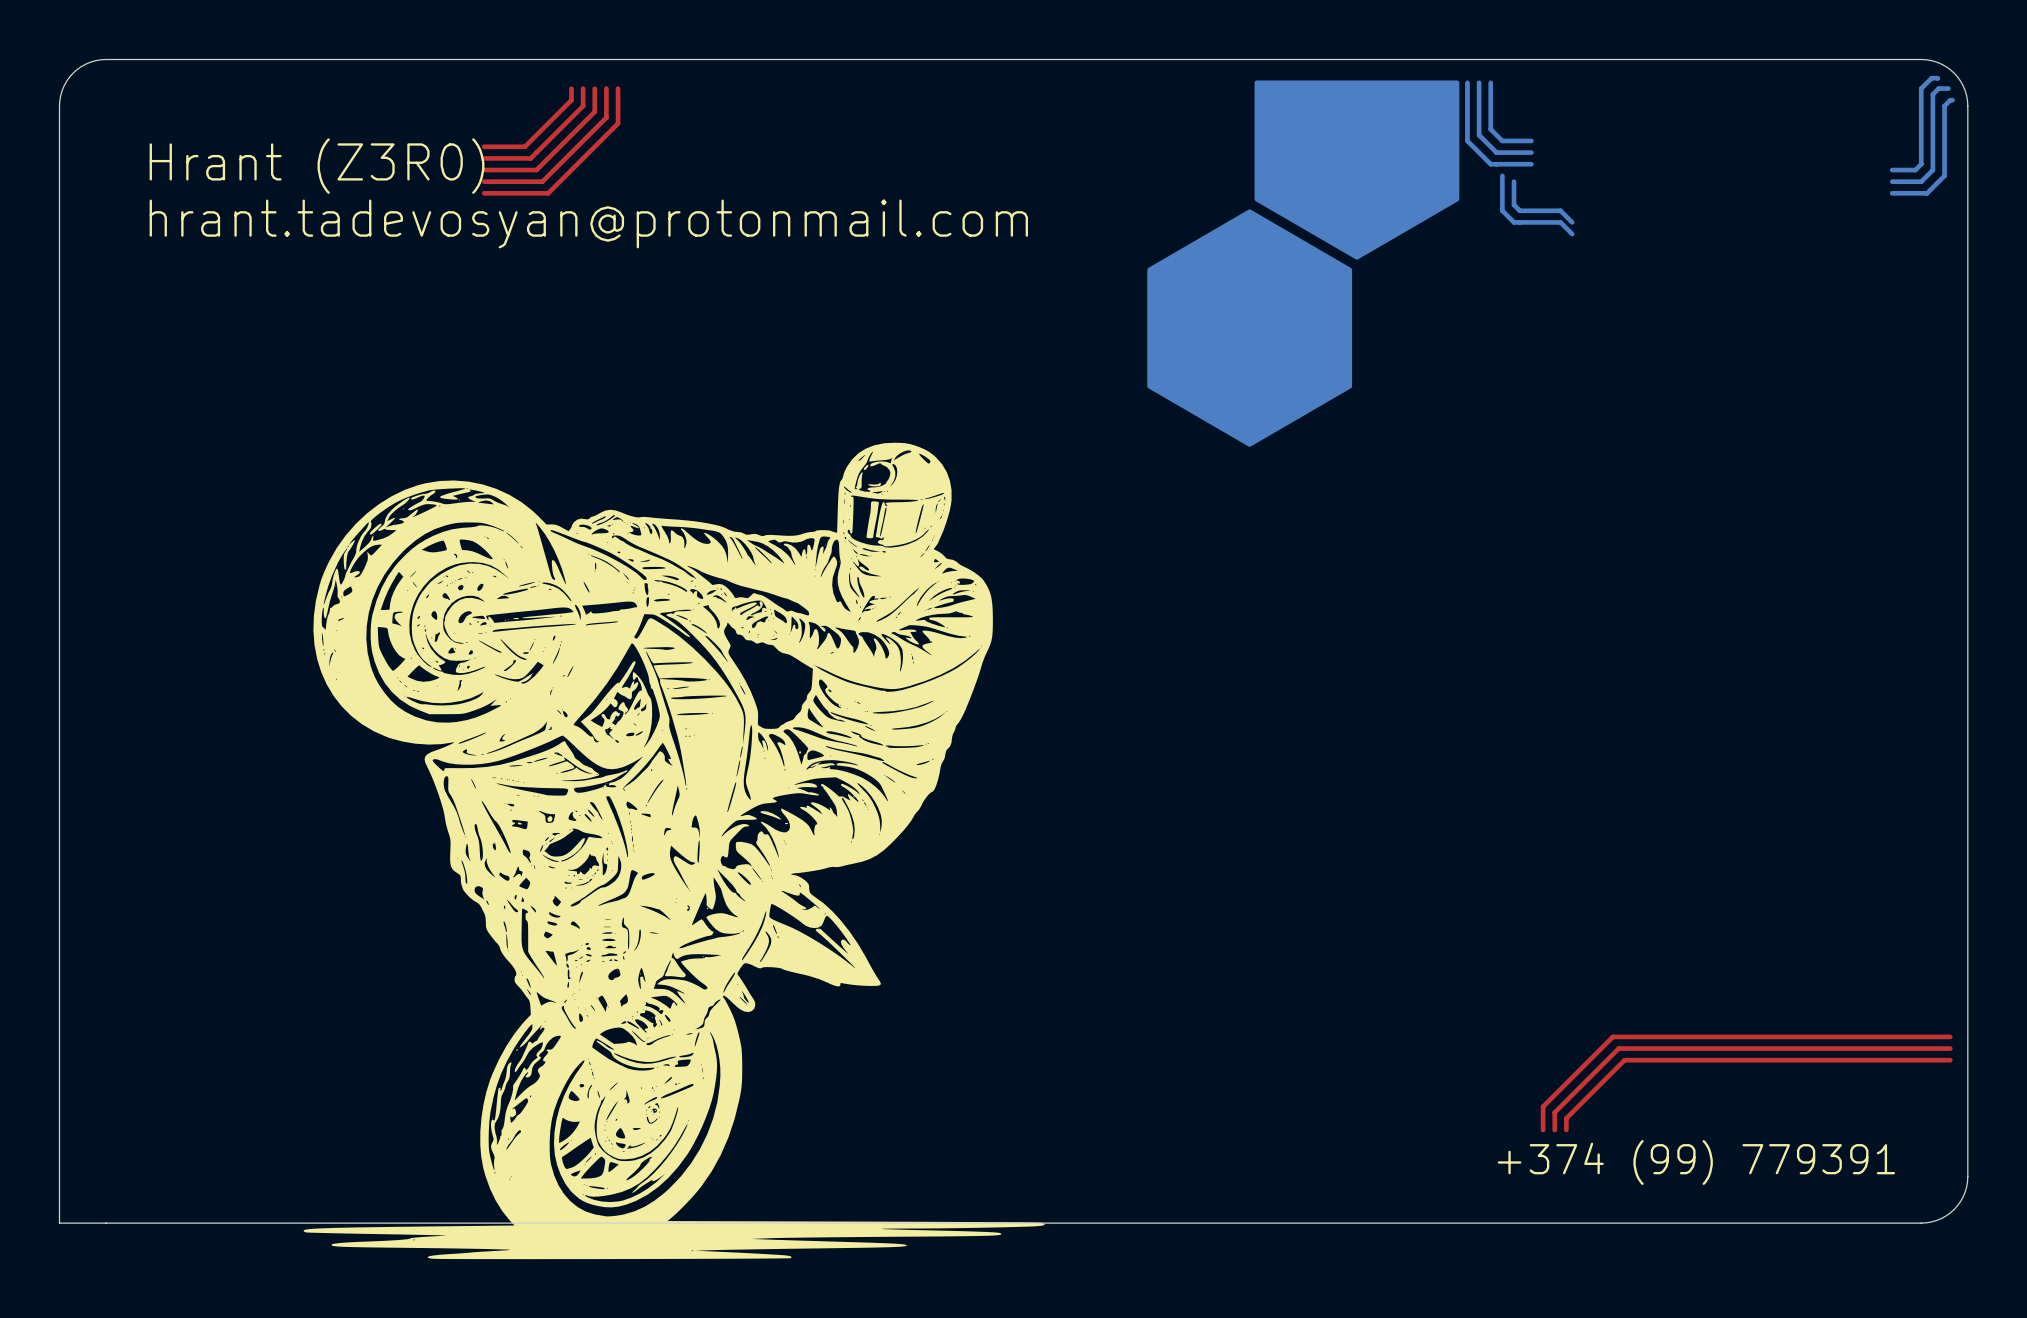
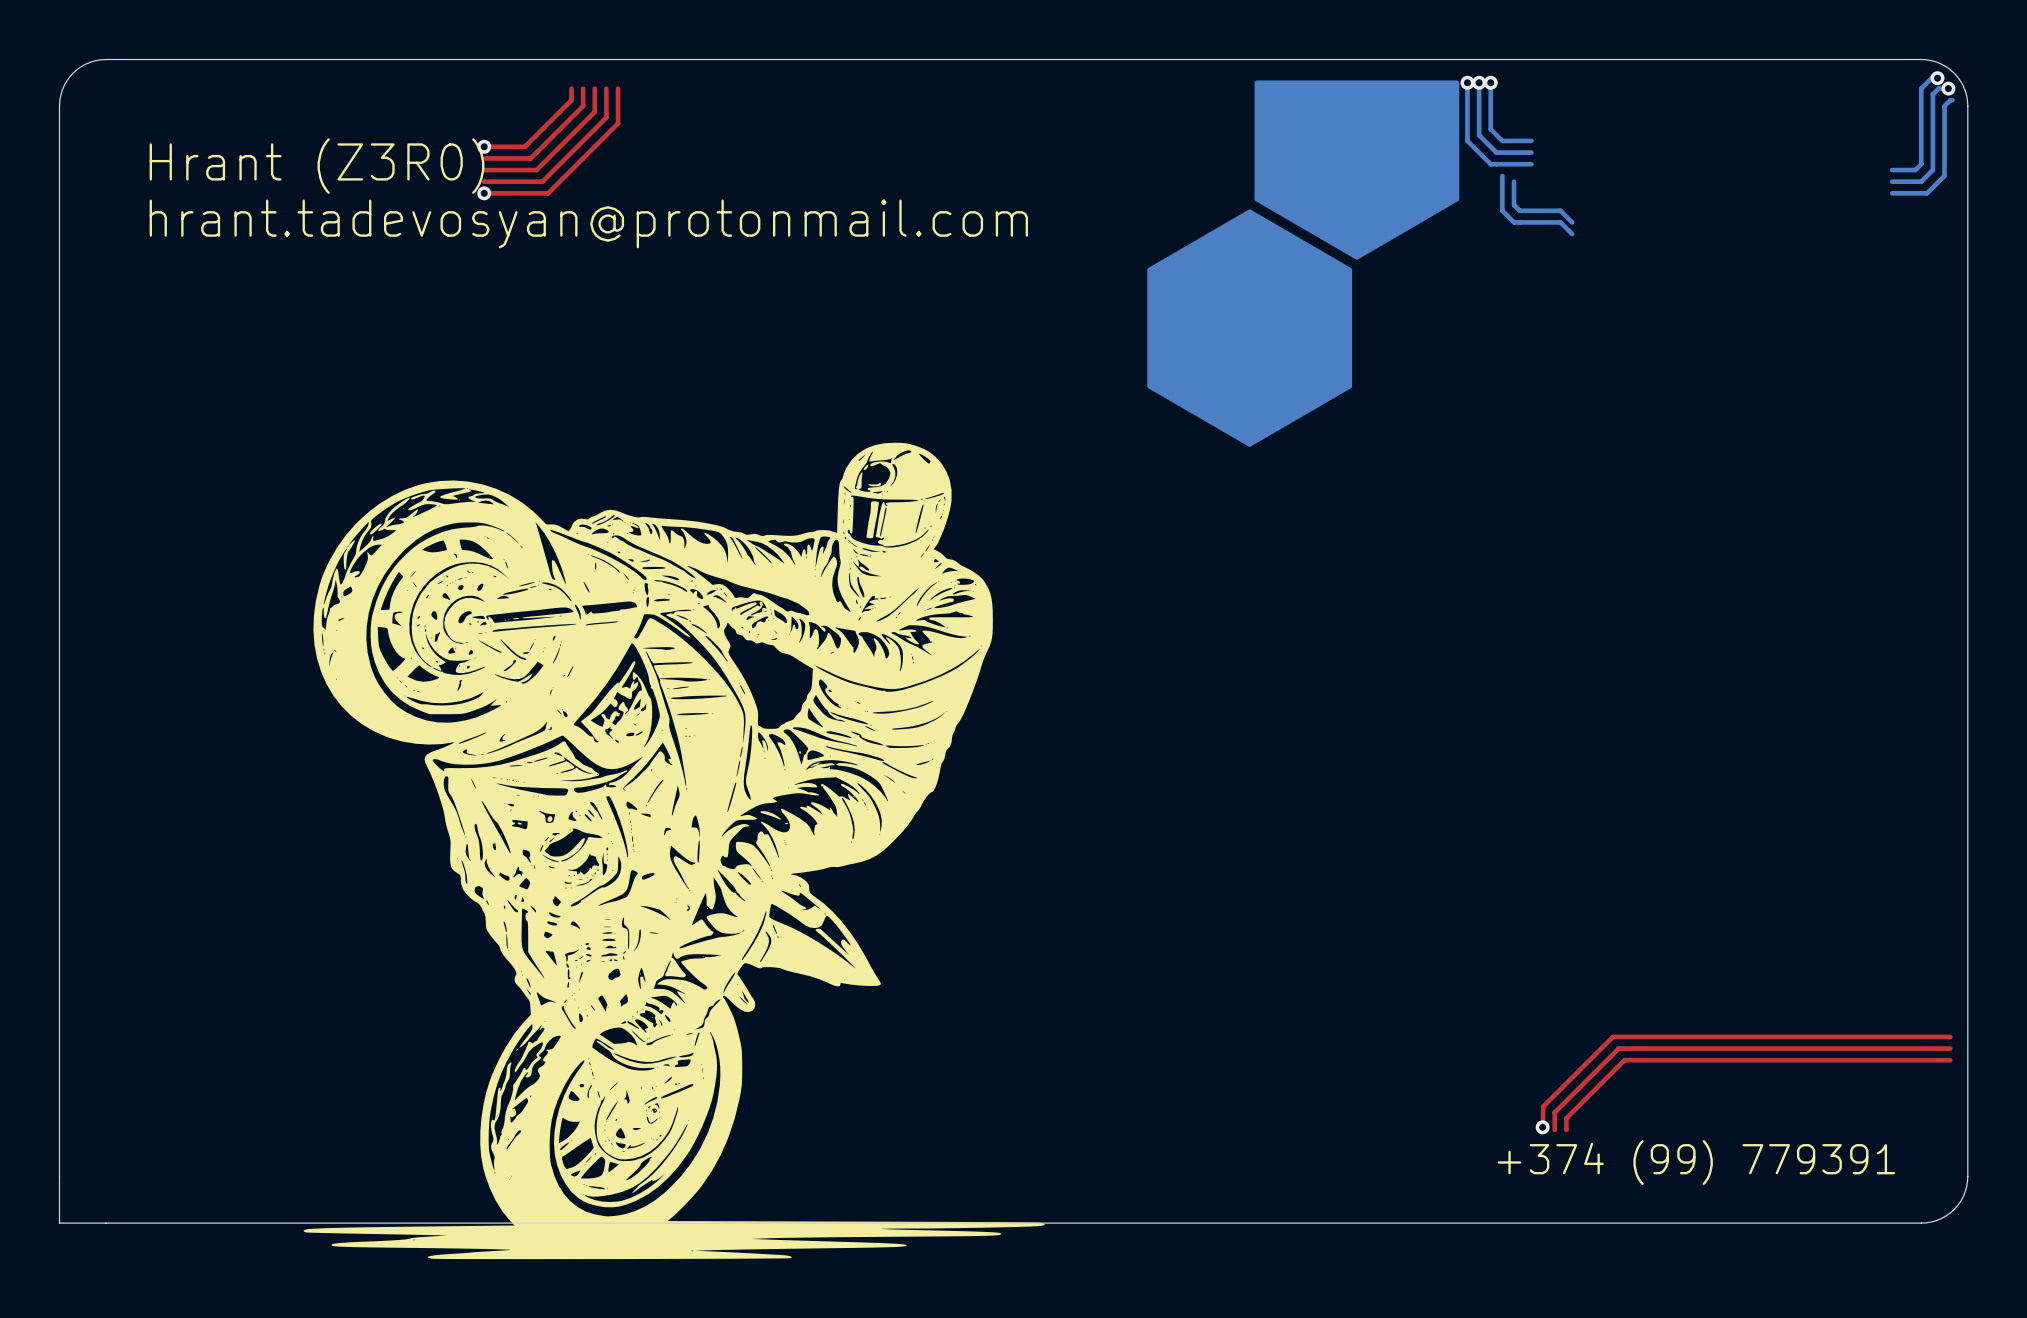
via: none -> (1937, 78)
via: none -> (1467, 82)
via: none -> (1479, 82)
via: none -> (1490, 82)
via: none -> (1948, 88)
via: none -> (484, 146)
via: none -> (484, 193)
via: none -> (1542, 1127)

